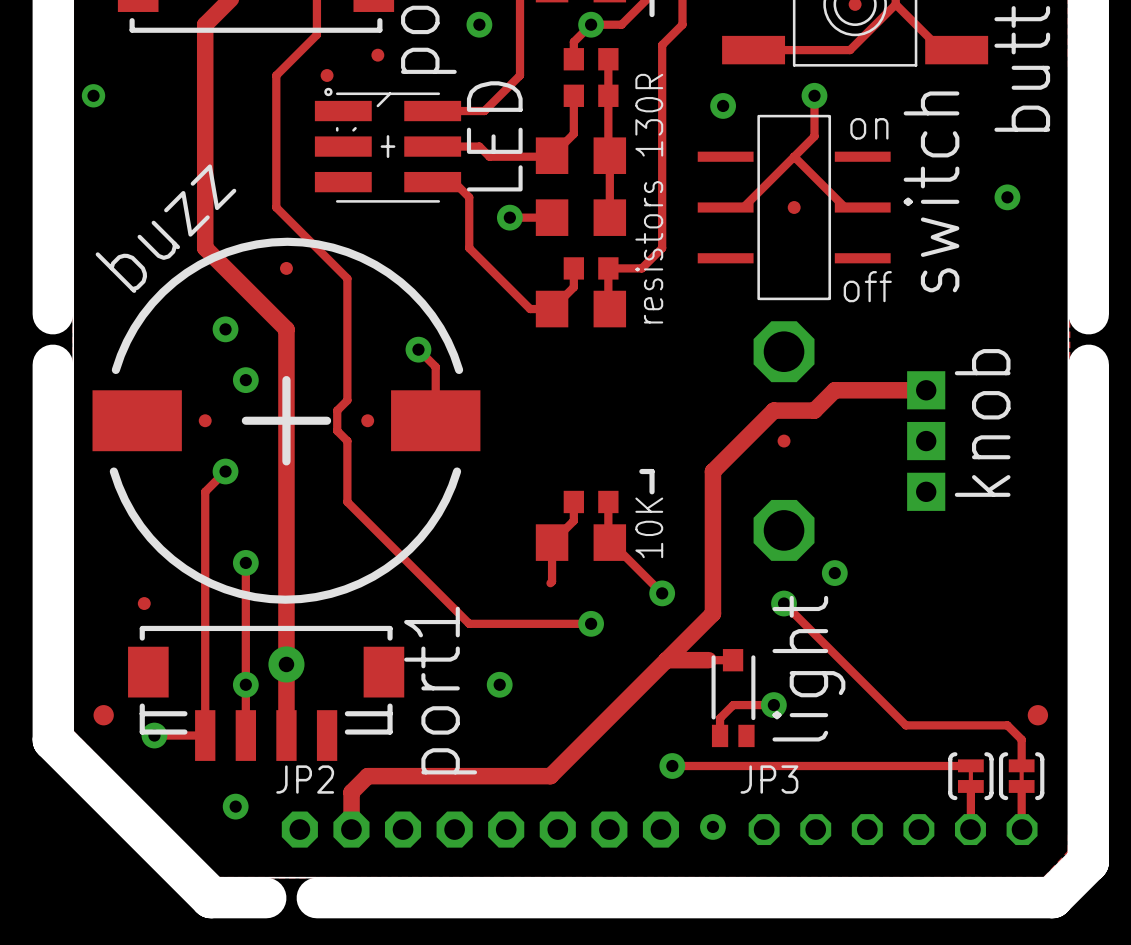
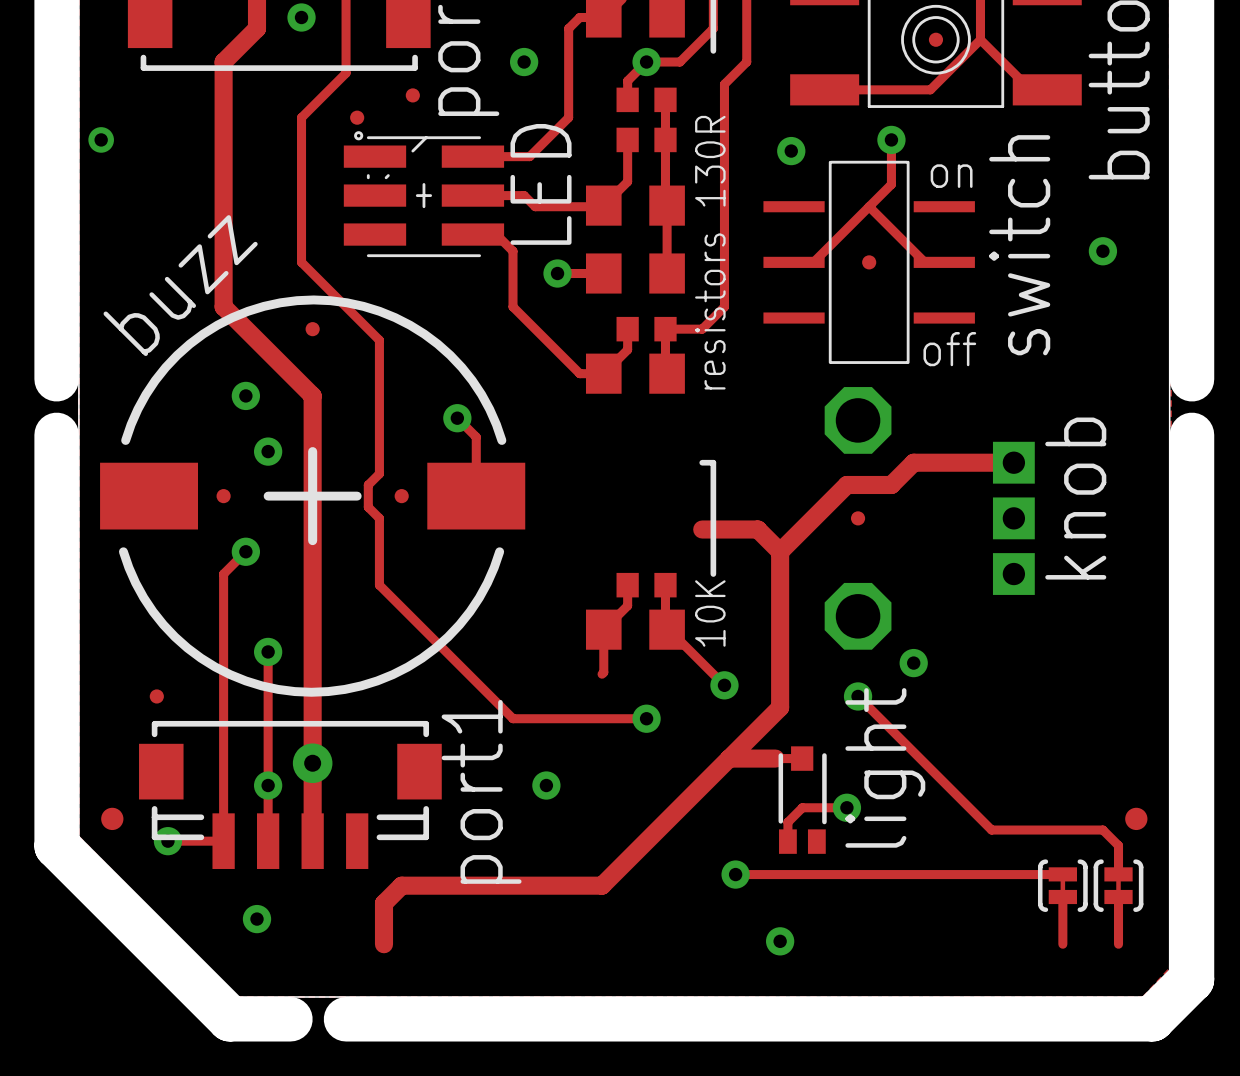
track: none -> (702, 529) (757, 529) (780, 551)
line: (641, 471) (652, 471) -> (702, 462) (713, 462) (713, 551)
JP2: (480, 829) -> none
JP3: (893, 829) -> none

